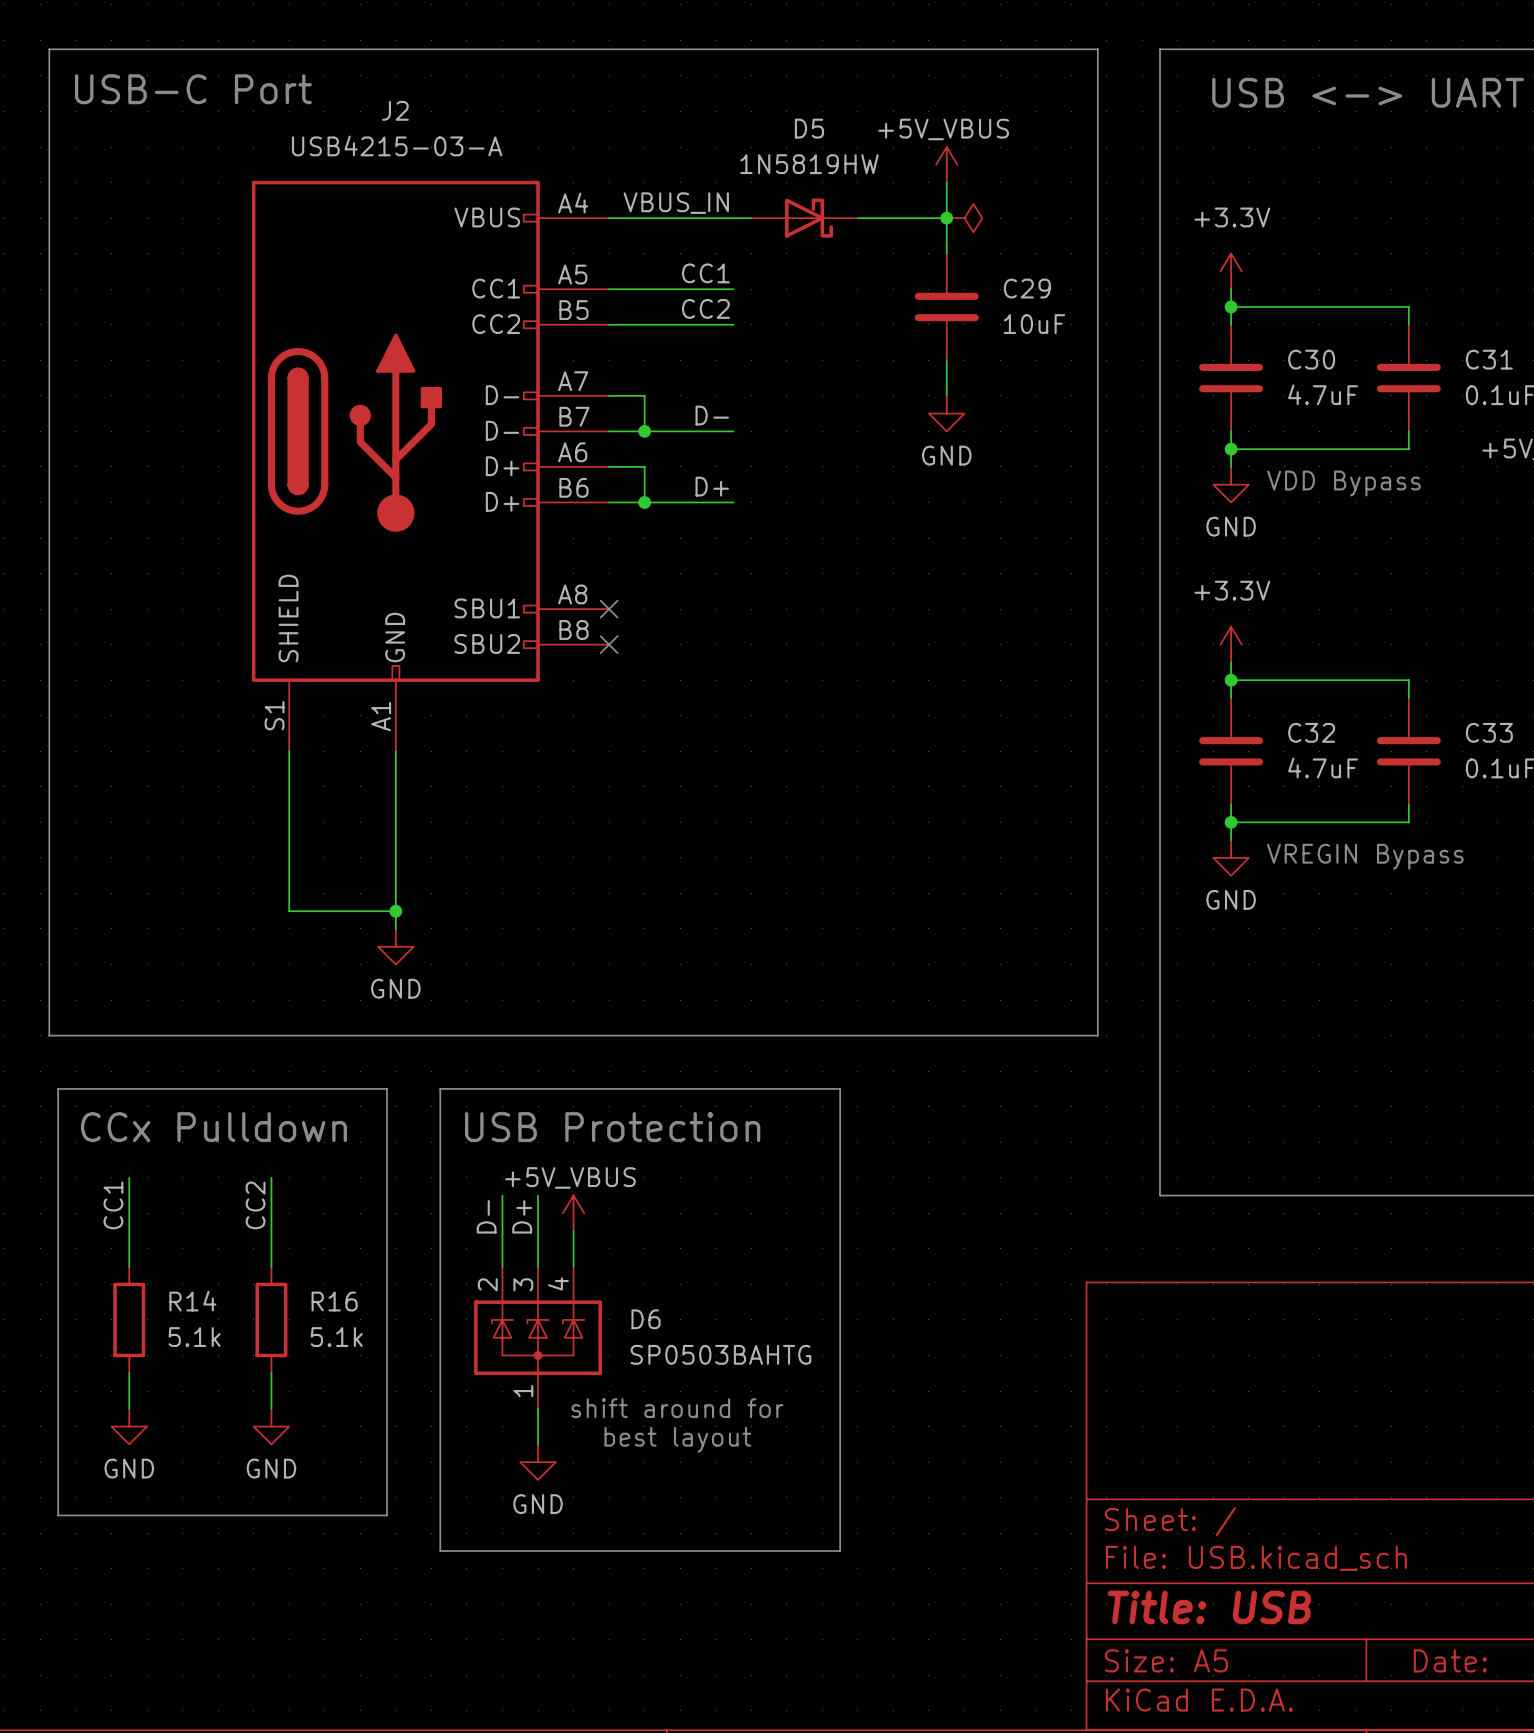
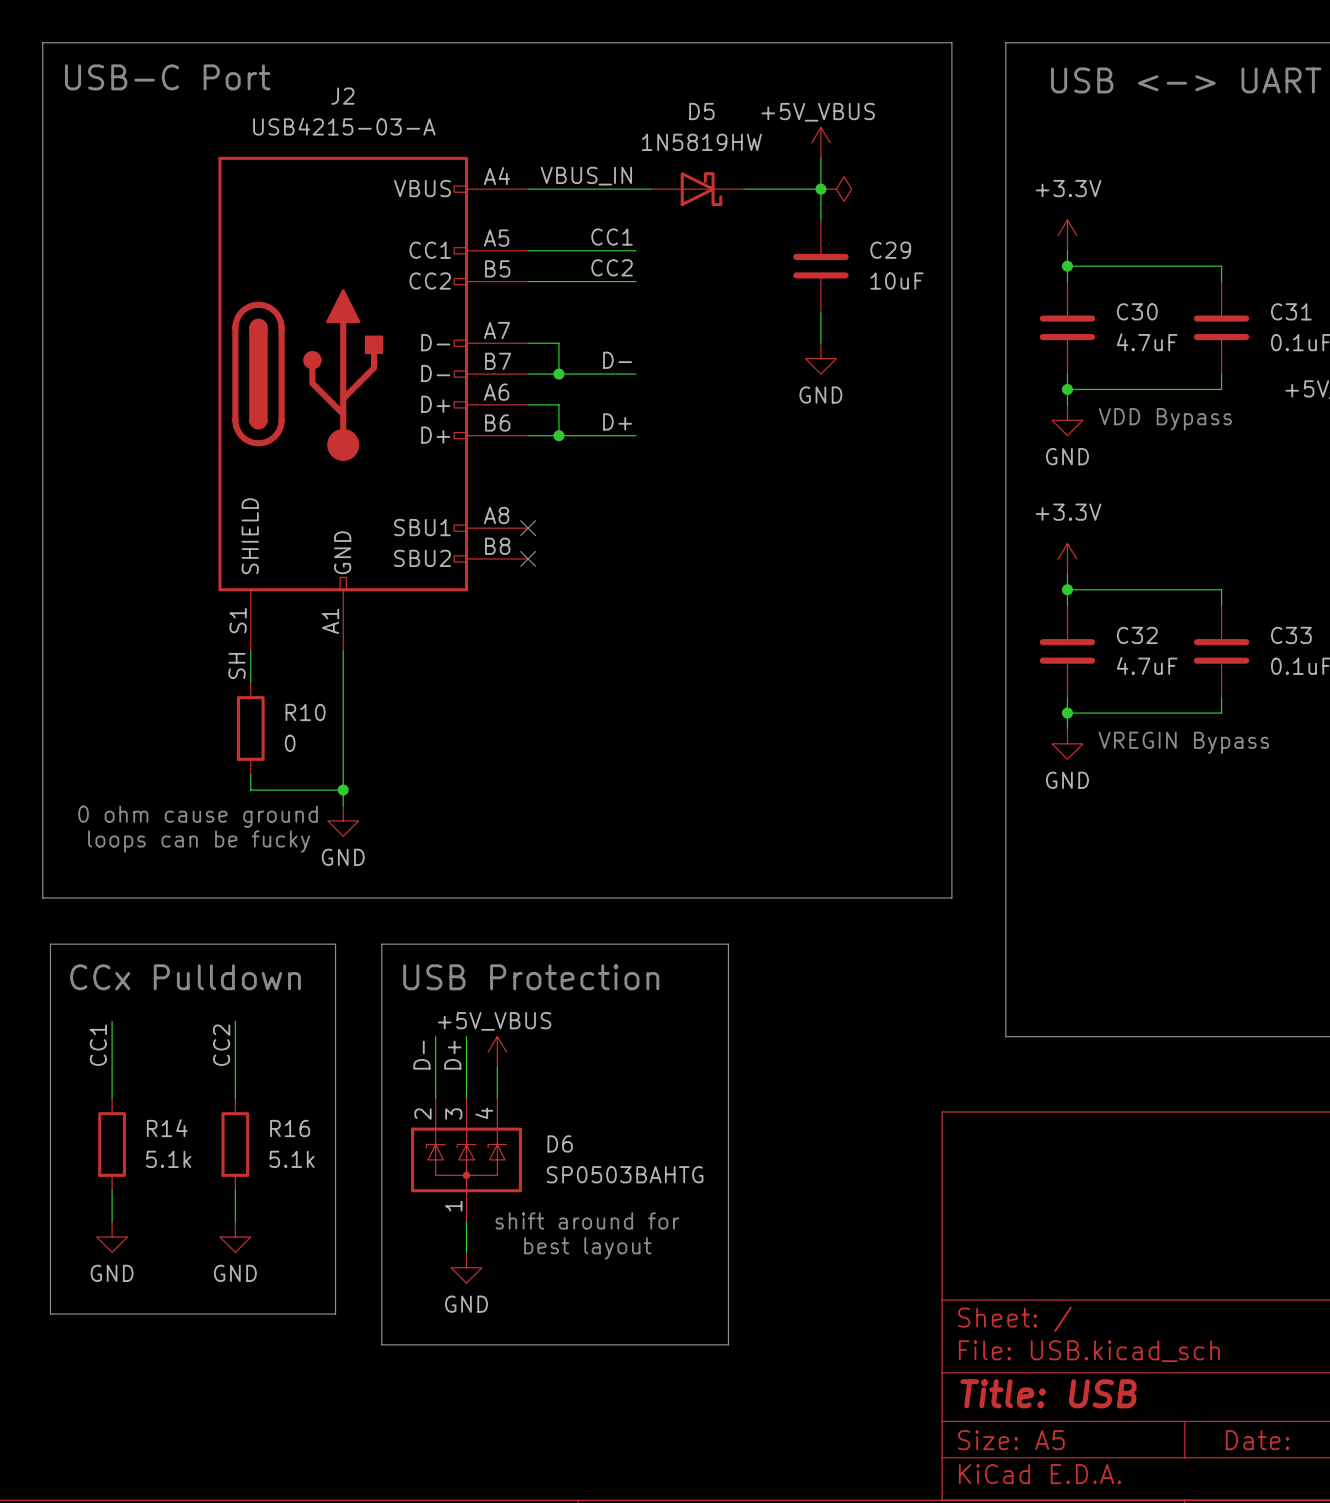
label: none -> SH (237, 665)
wire: (289, 786) (289, 893) -> none
R10: none -> 0 (250, 728)
text: none -> 0 ohm cause ground (198, 816)
text: none -> loops can be fucky (199, 841)

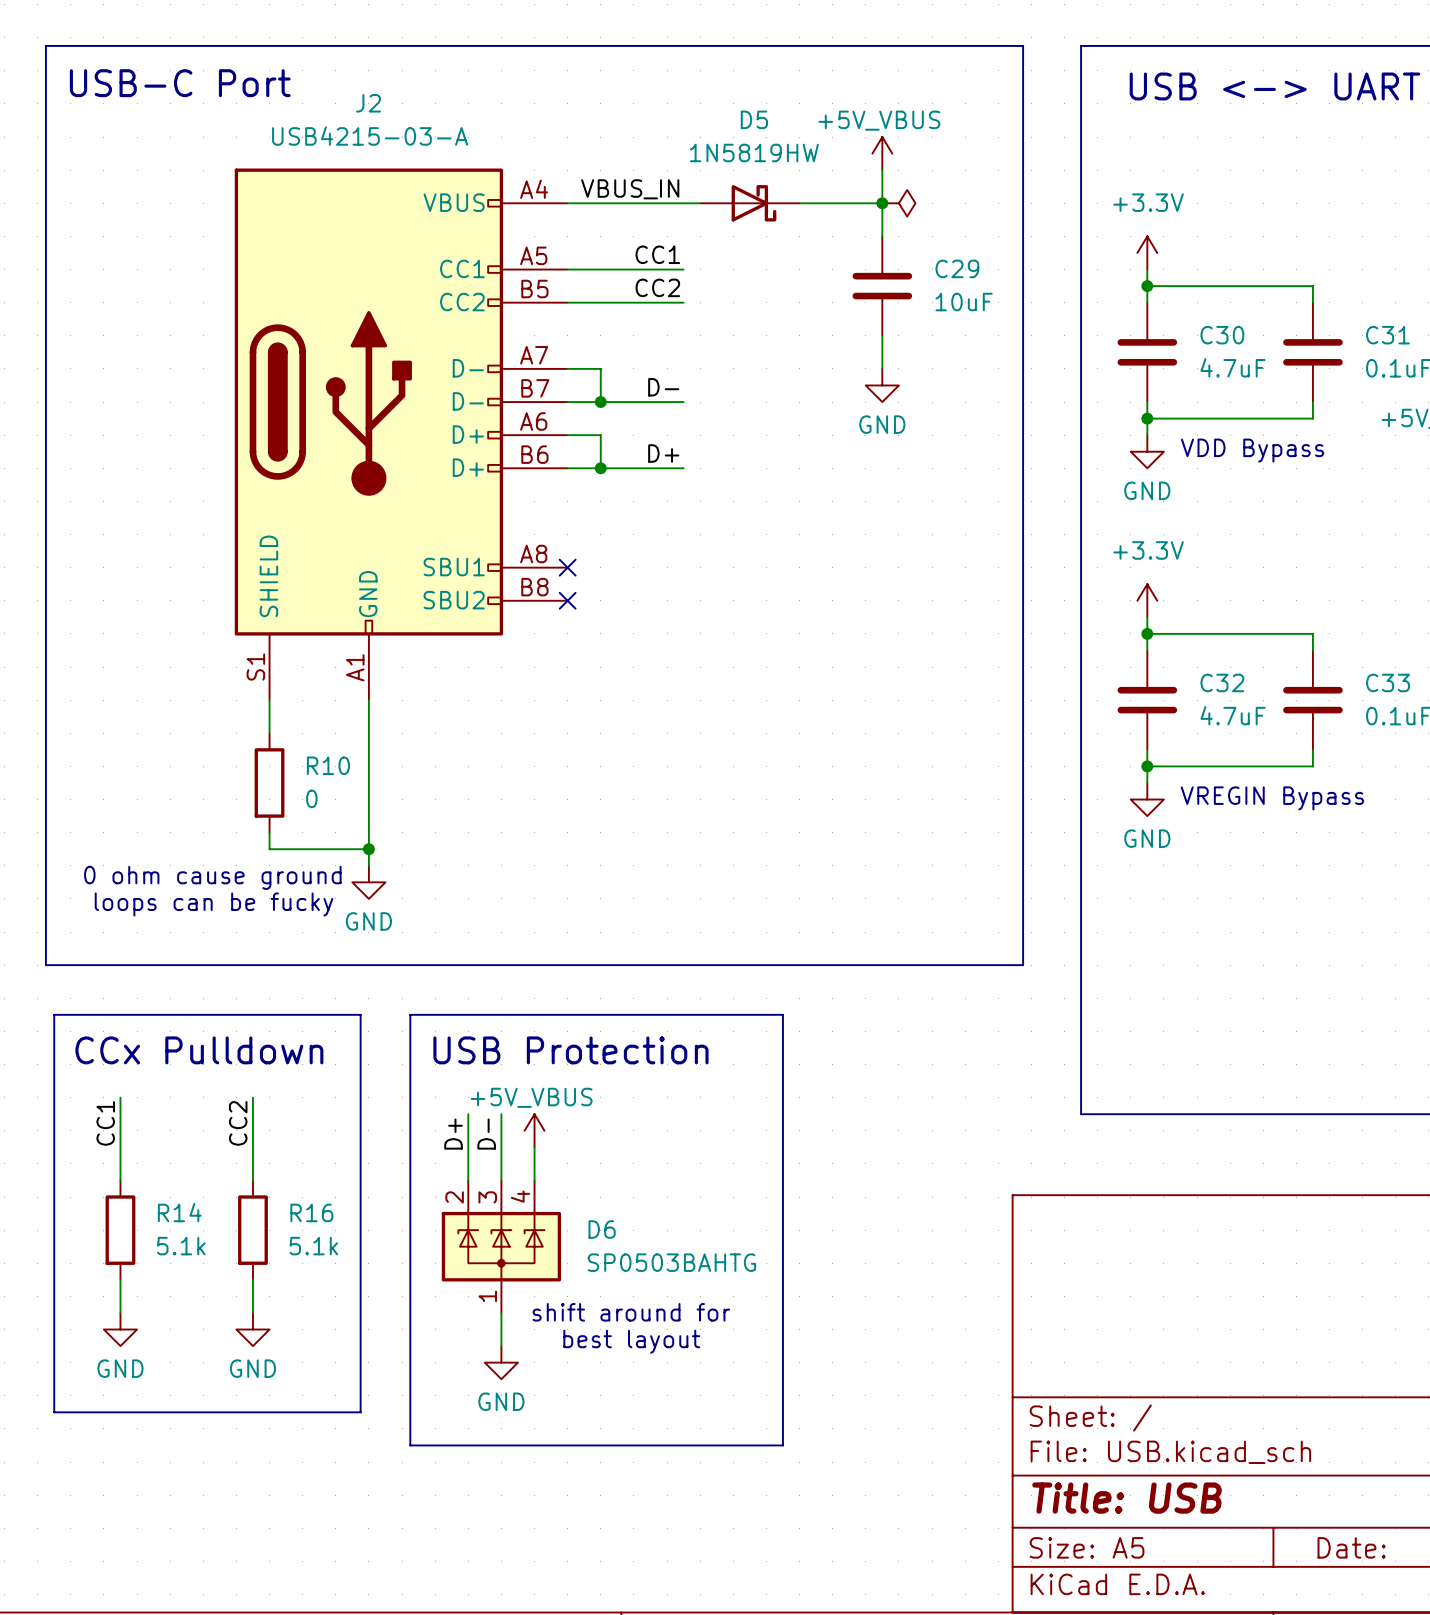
label: SH (237, 665) -> none
label: D- (421, 1055) -> D+ (453, 1134)
label: D+ (452, 1055) -> D- (486, 1134)

